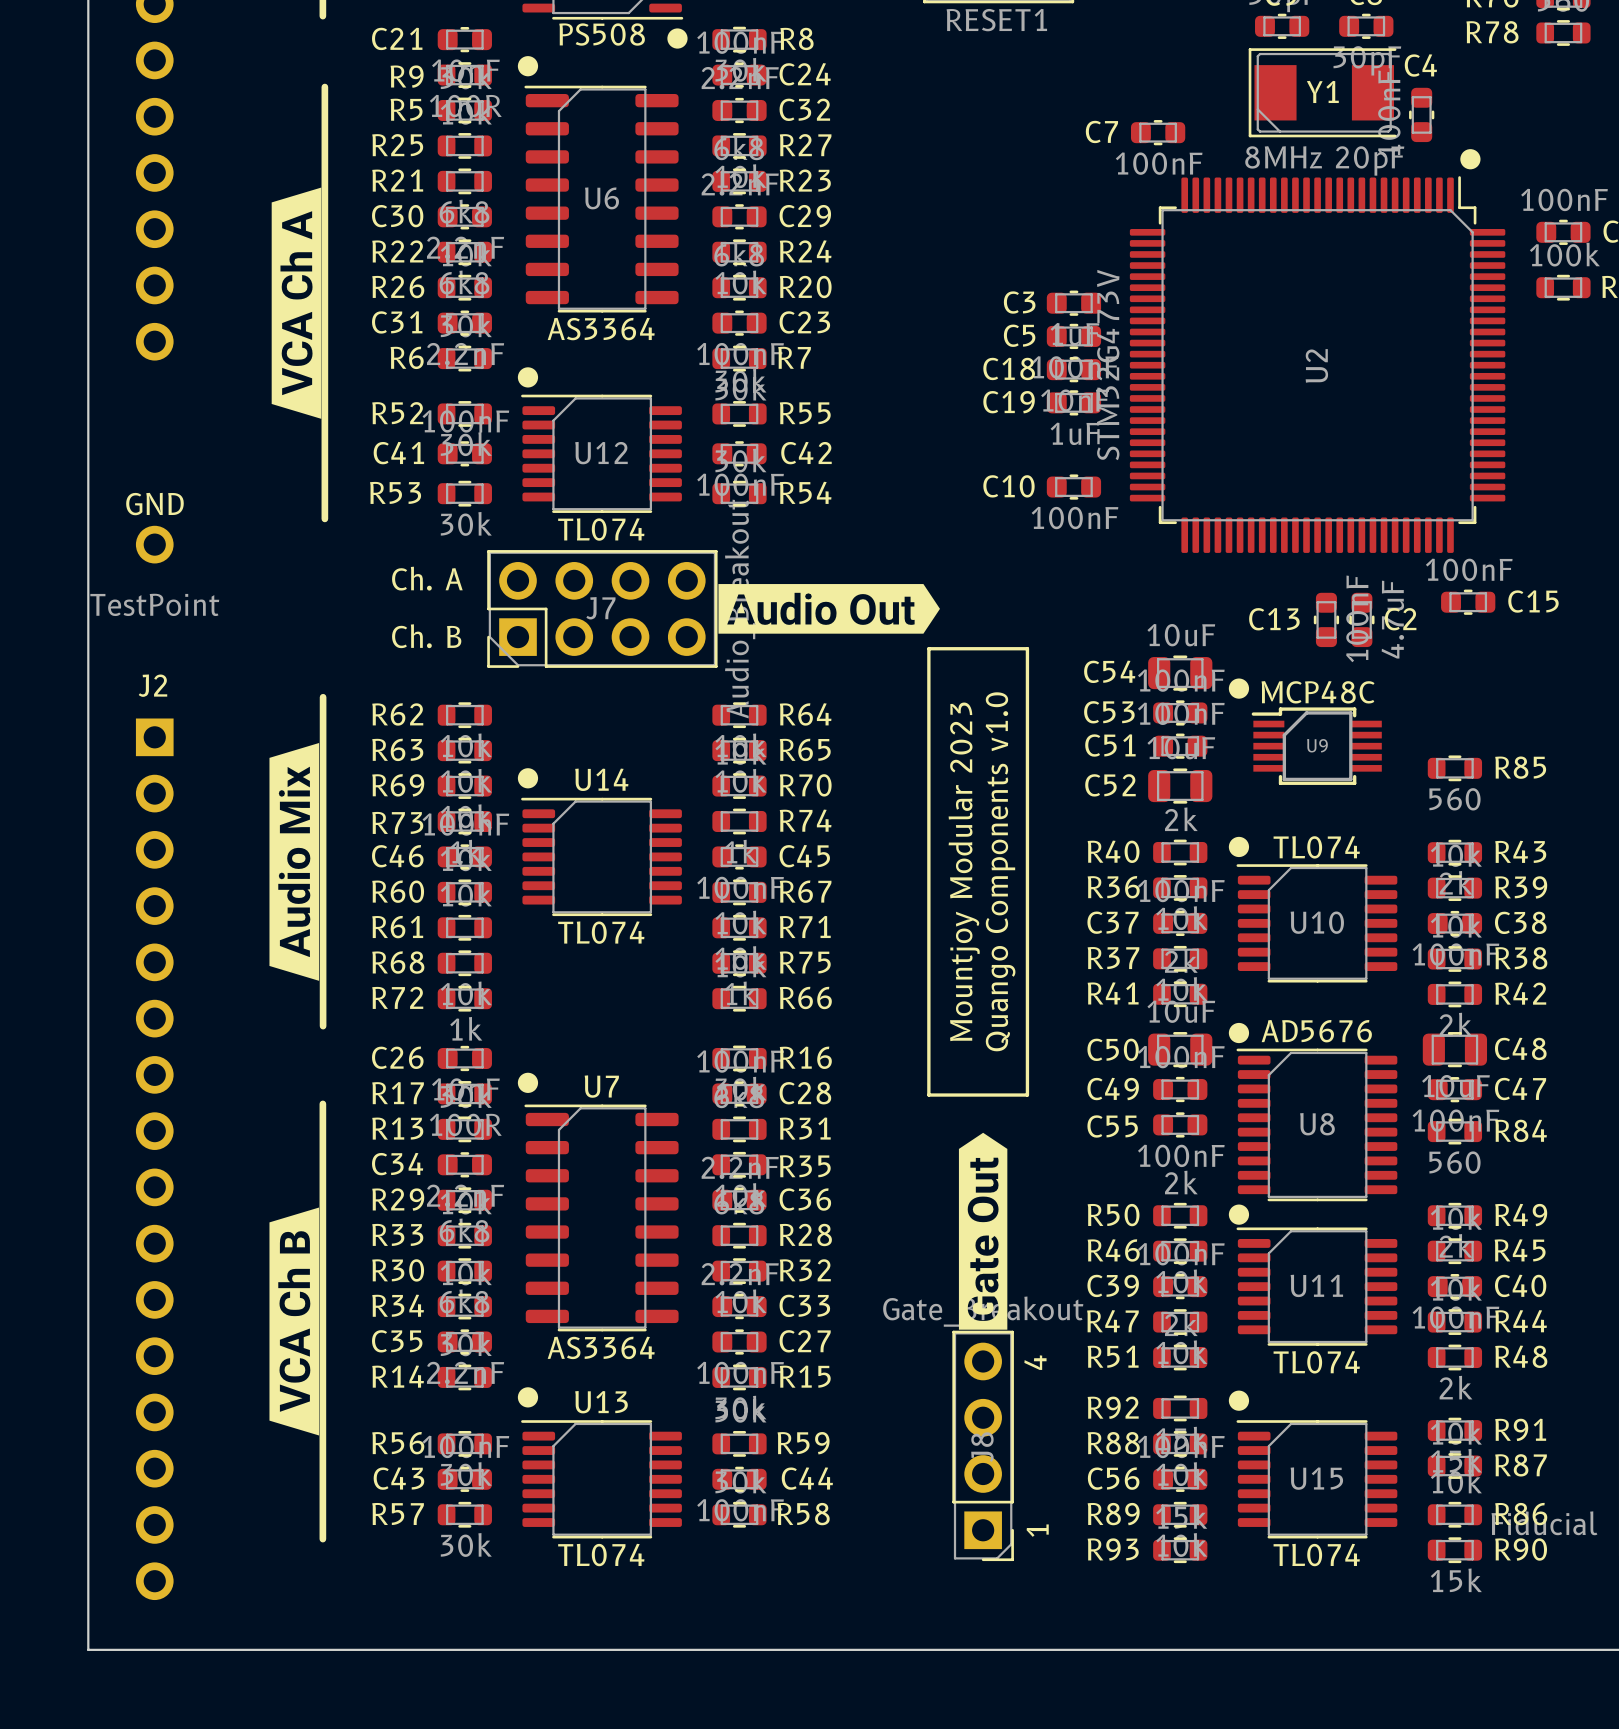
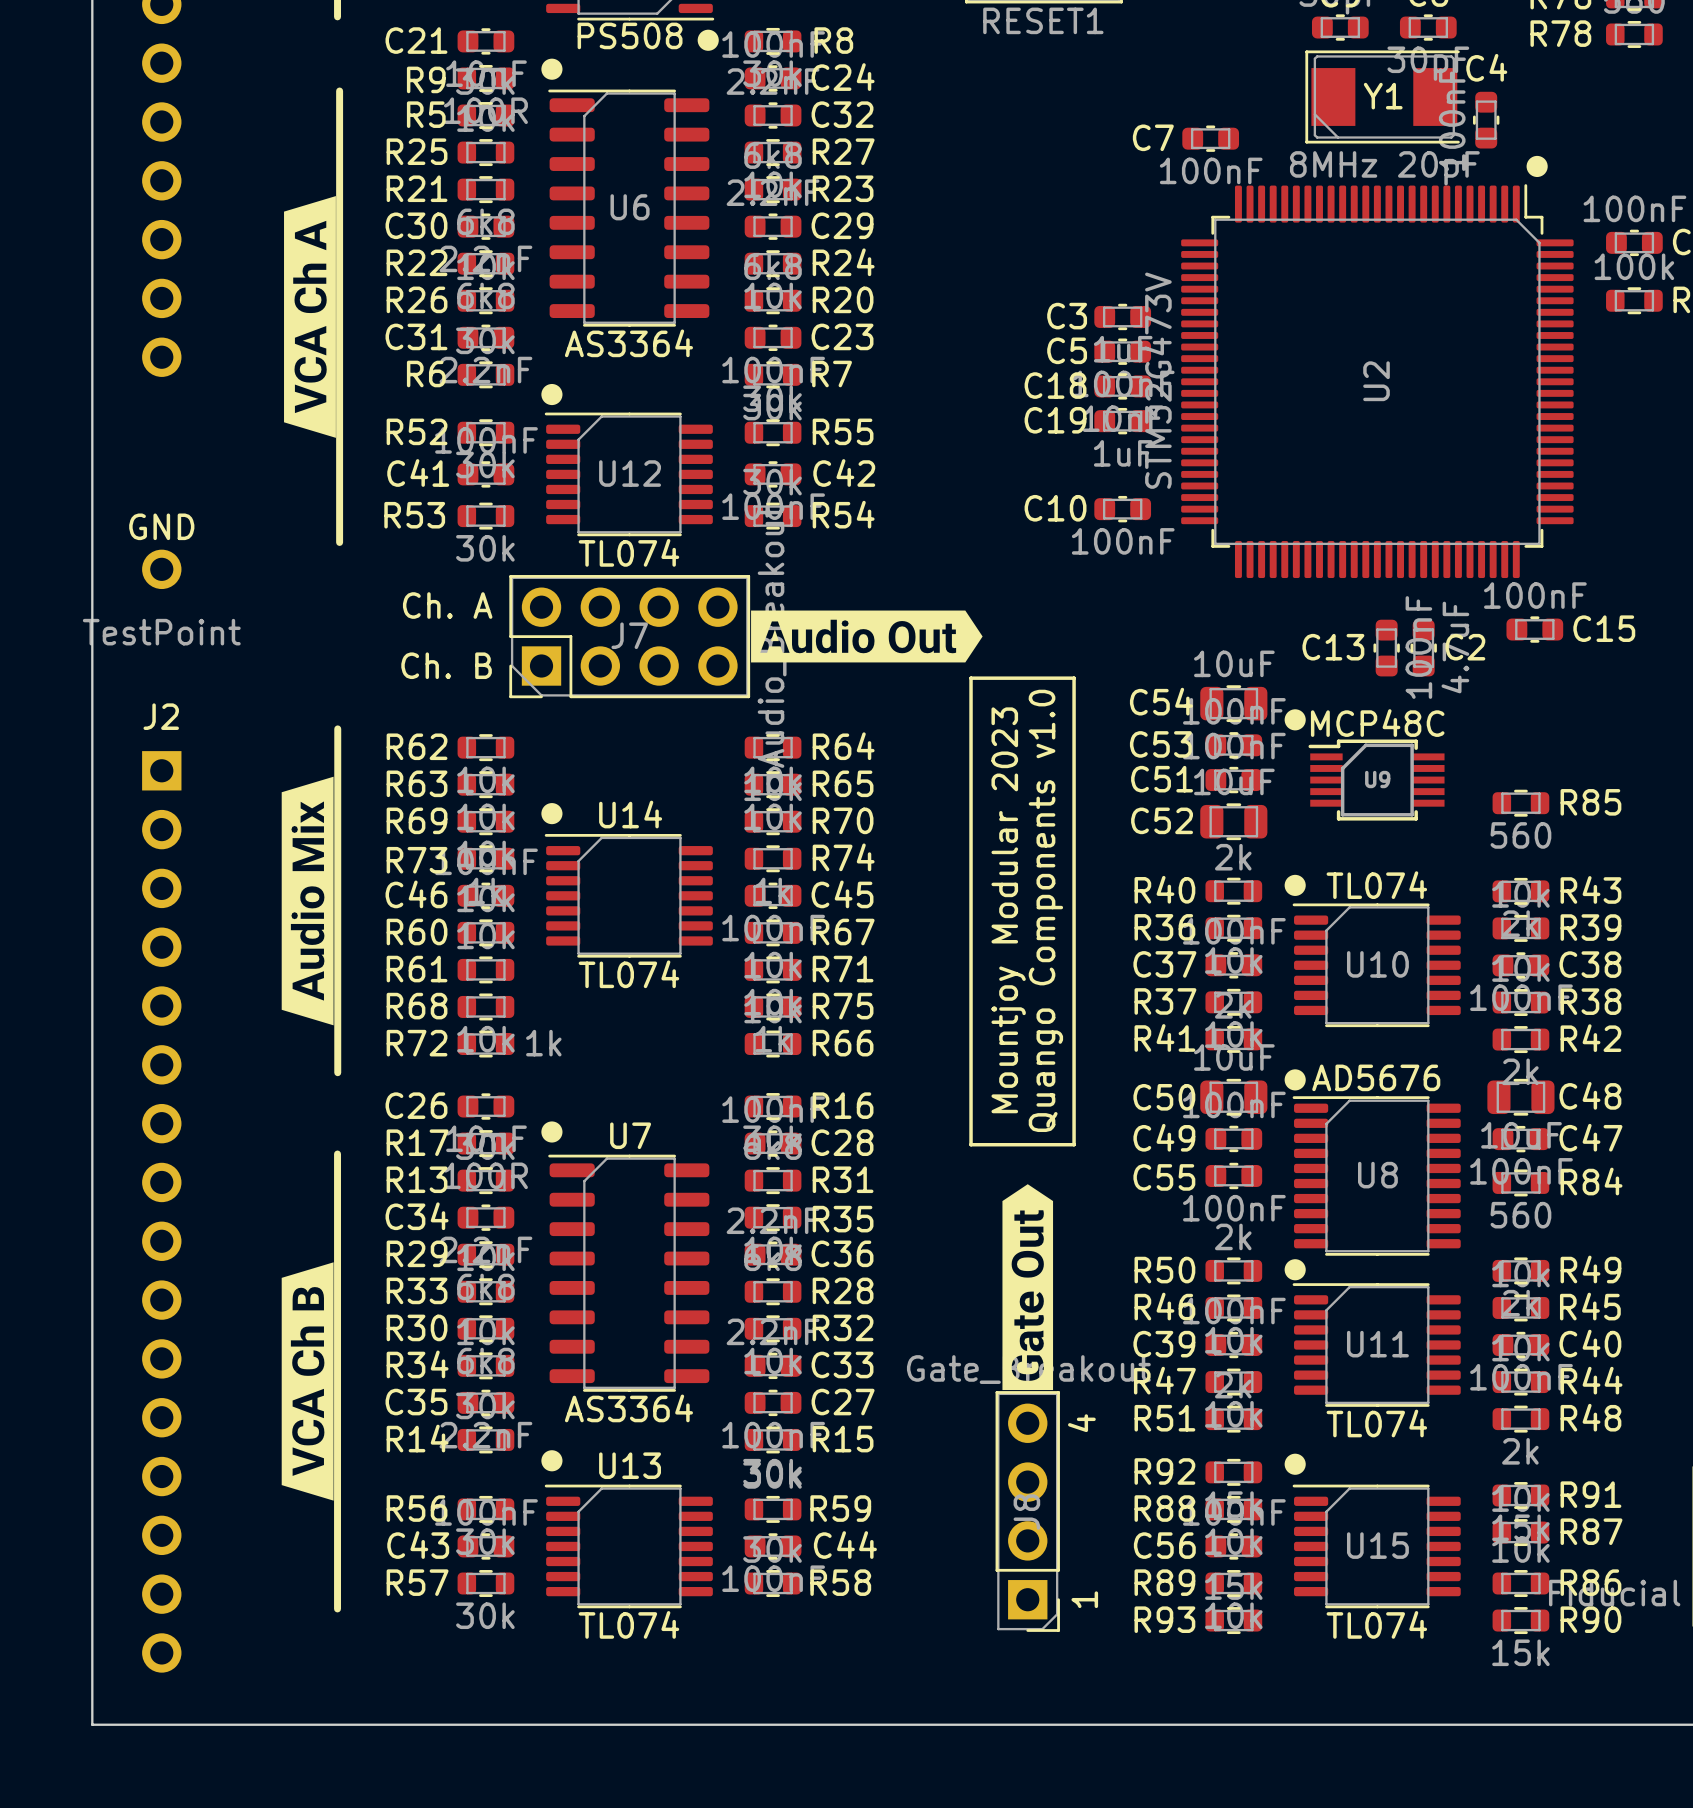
R72 value position: 1k (466, 1028) -> 1k (543, 1043)

